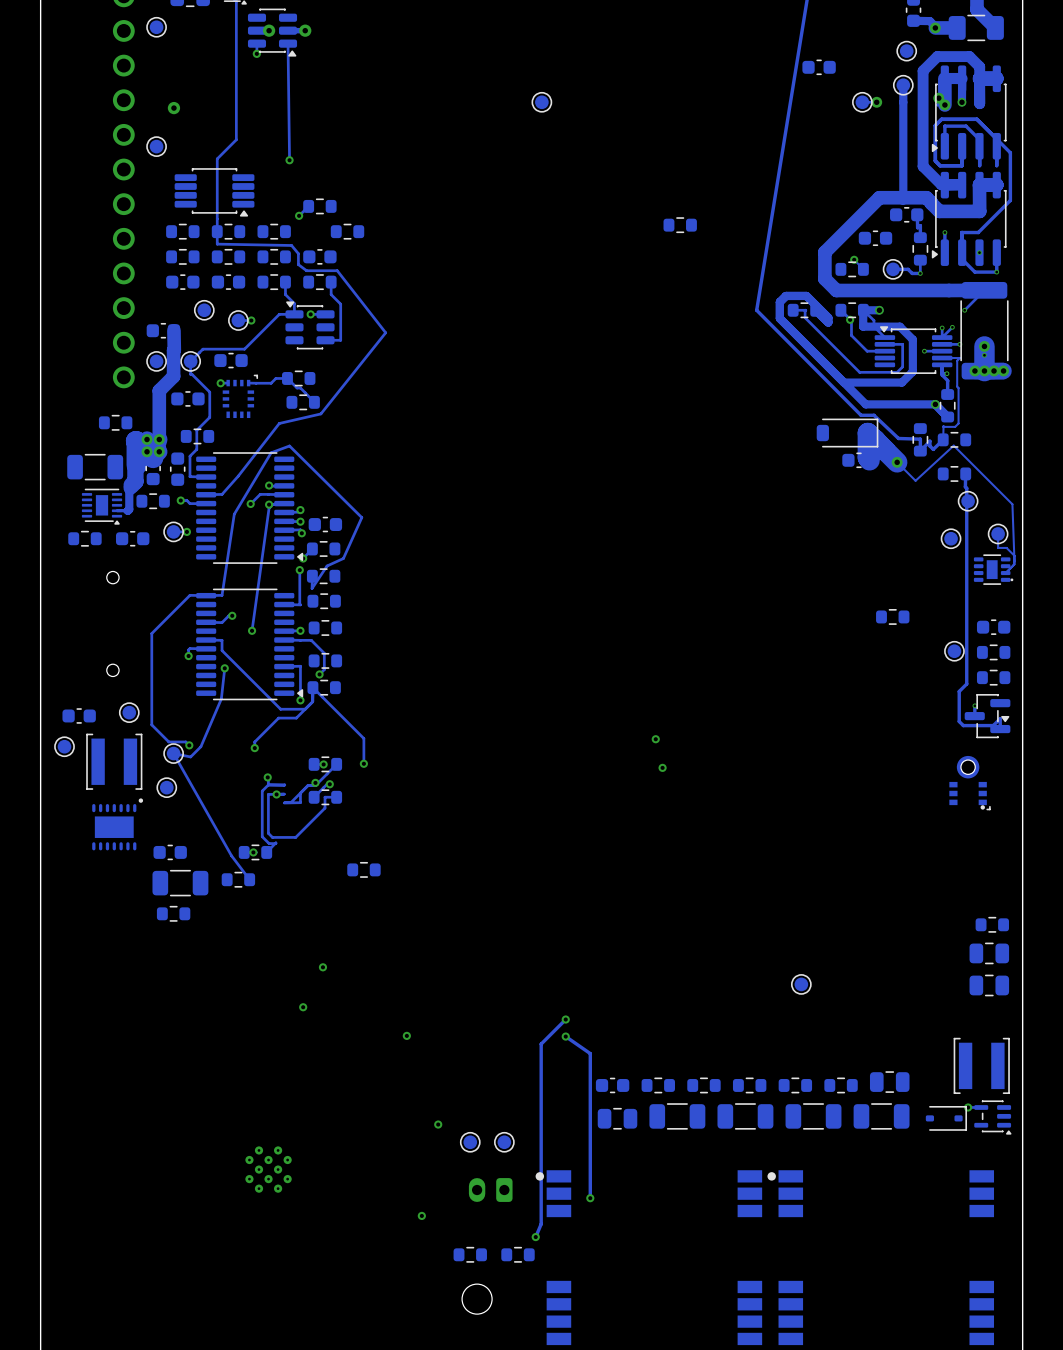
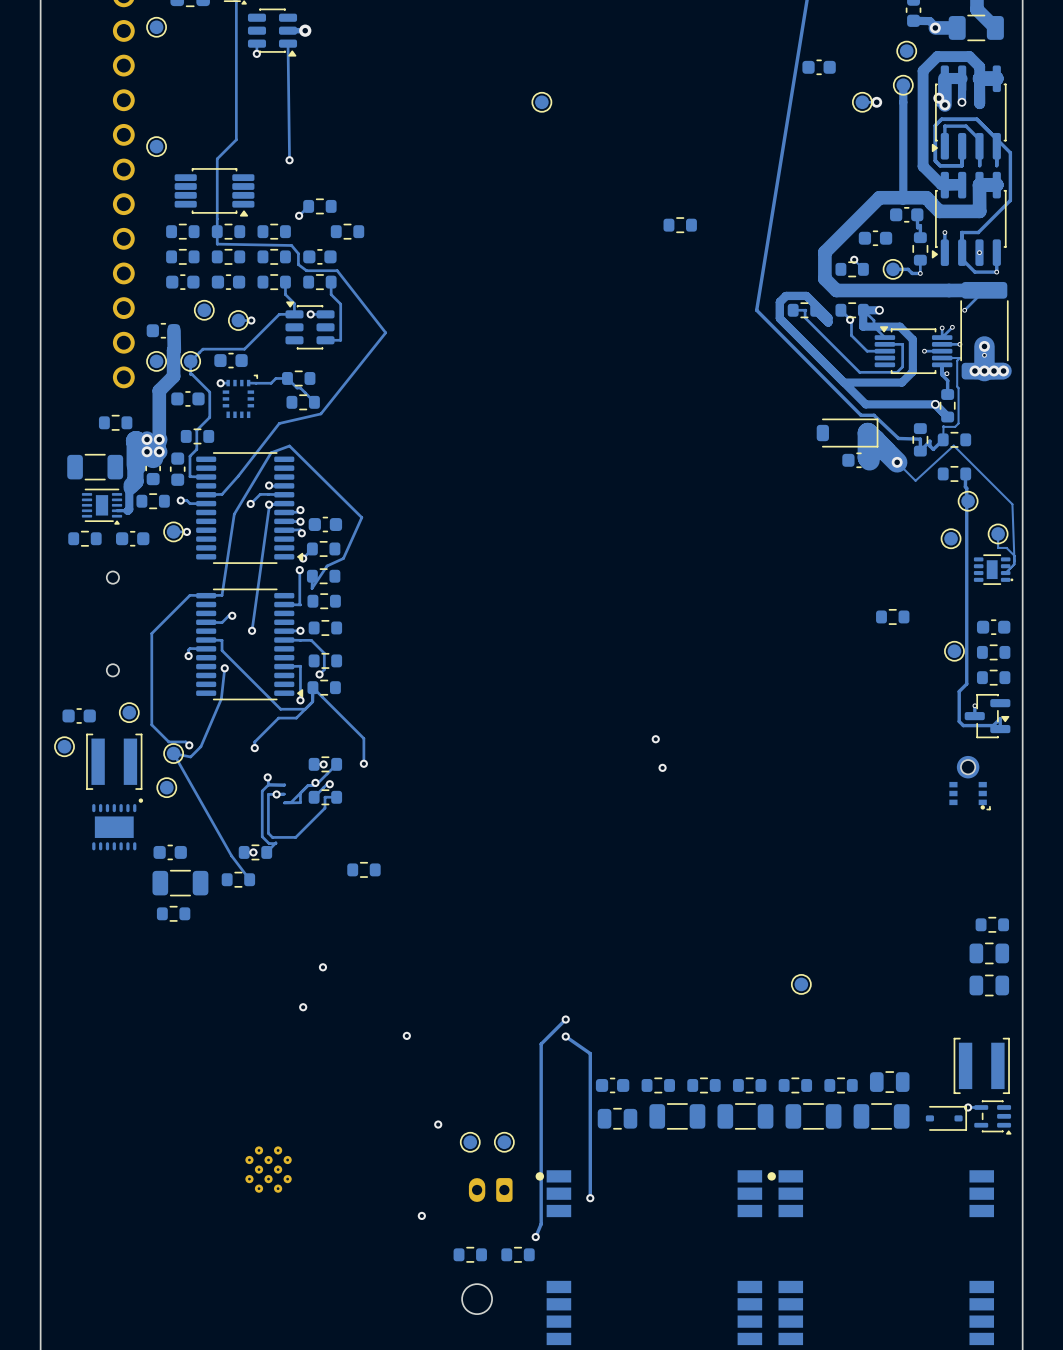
via: (269, 30) -> none
via: (173, 108) -> none

